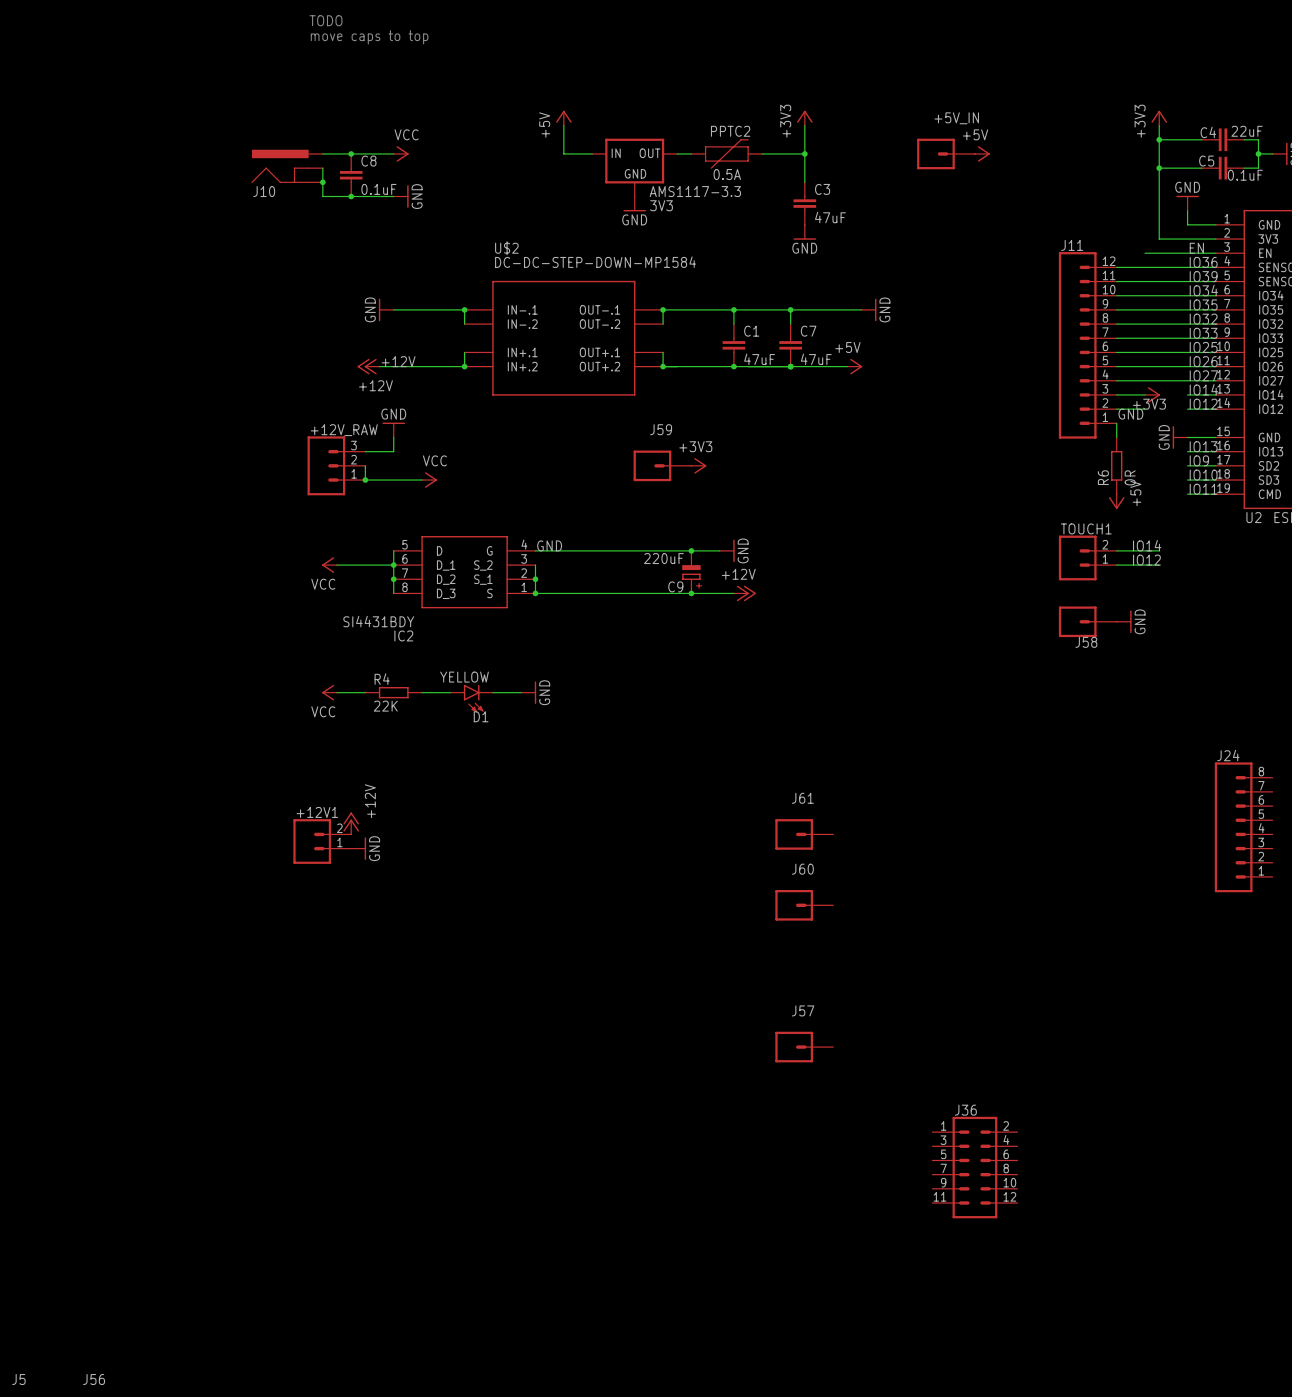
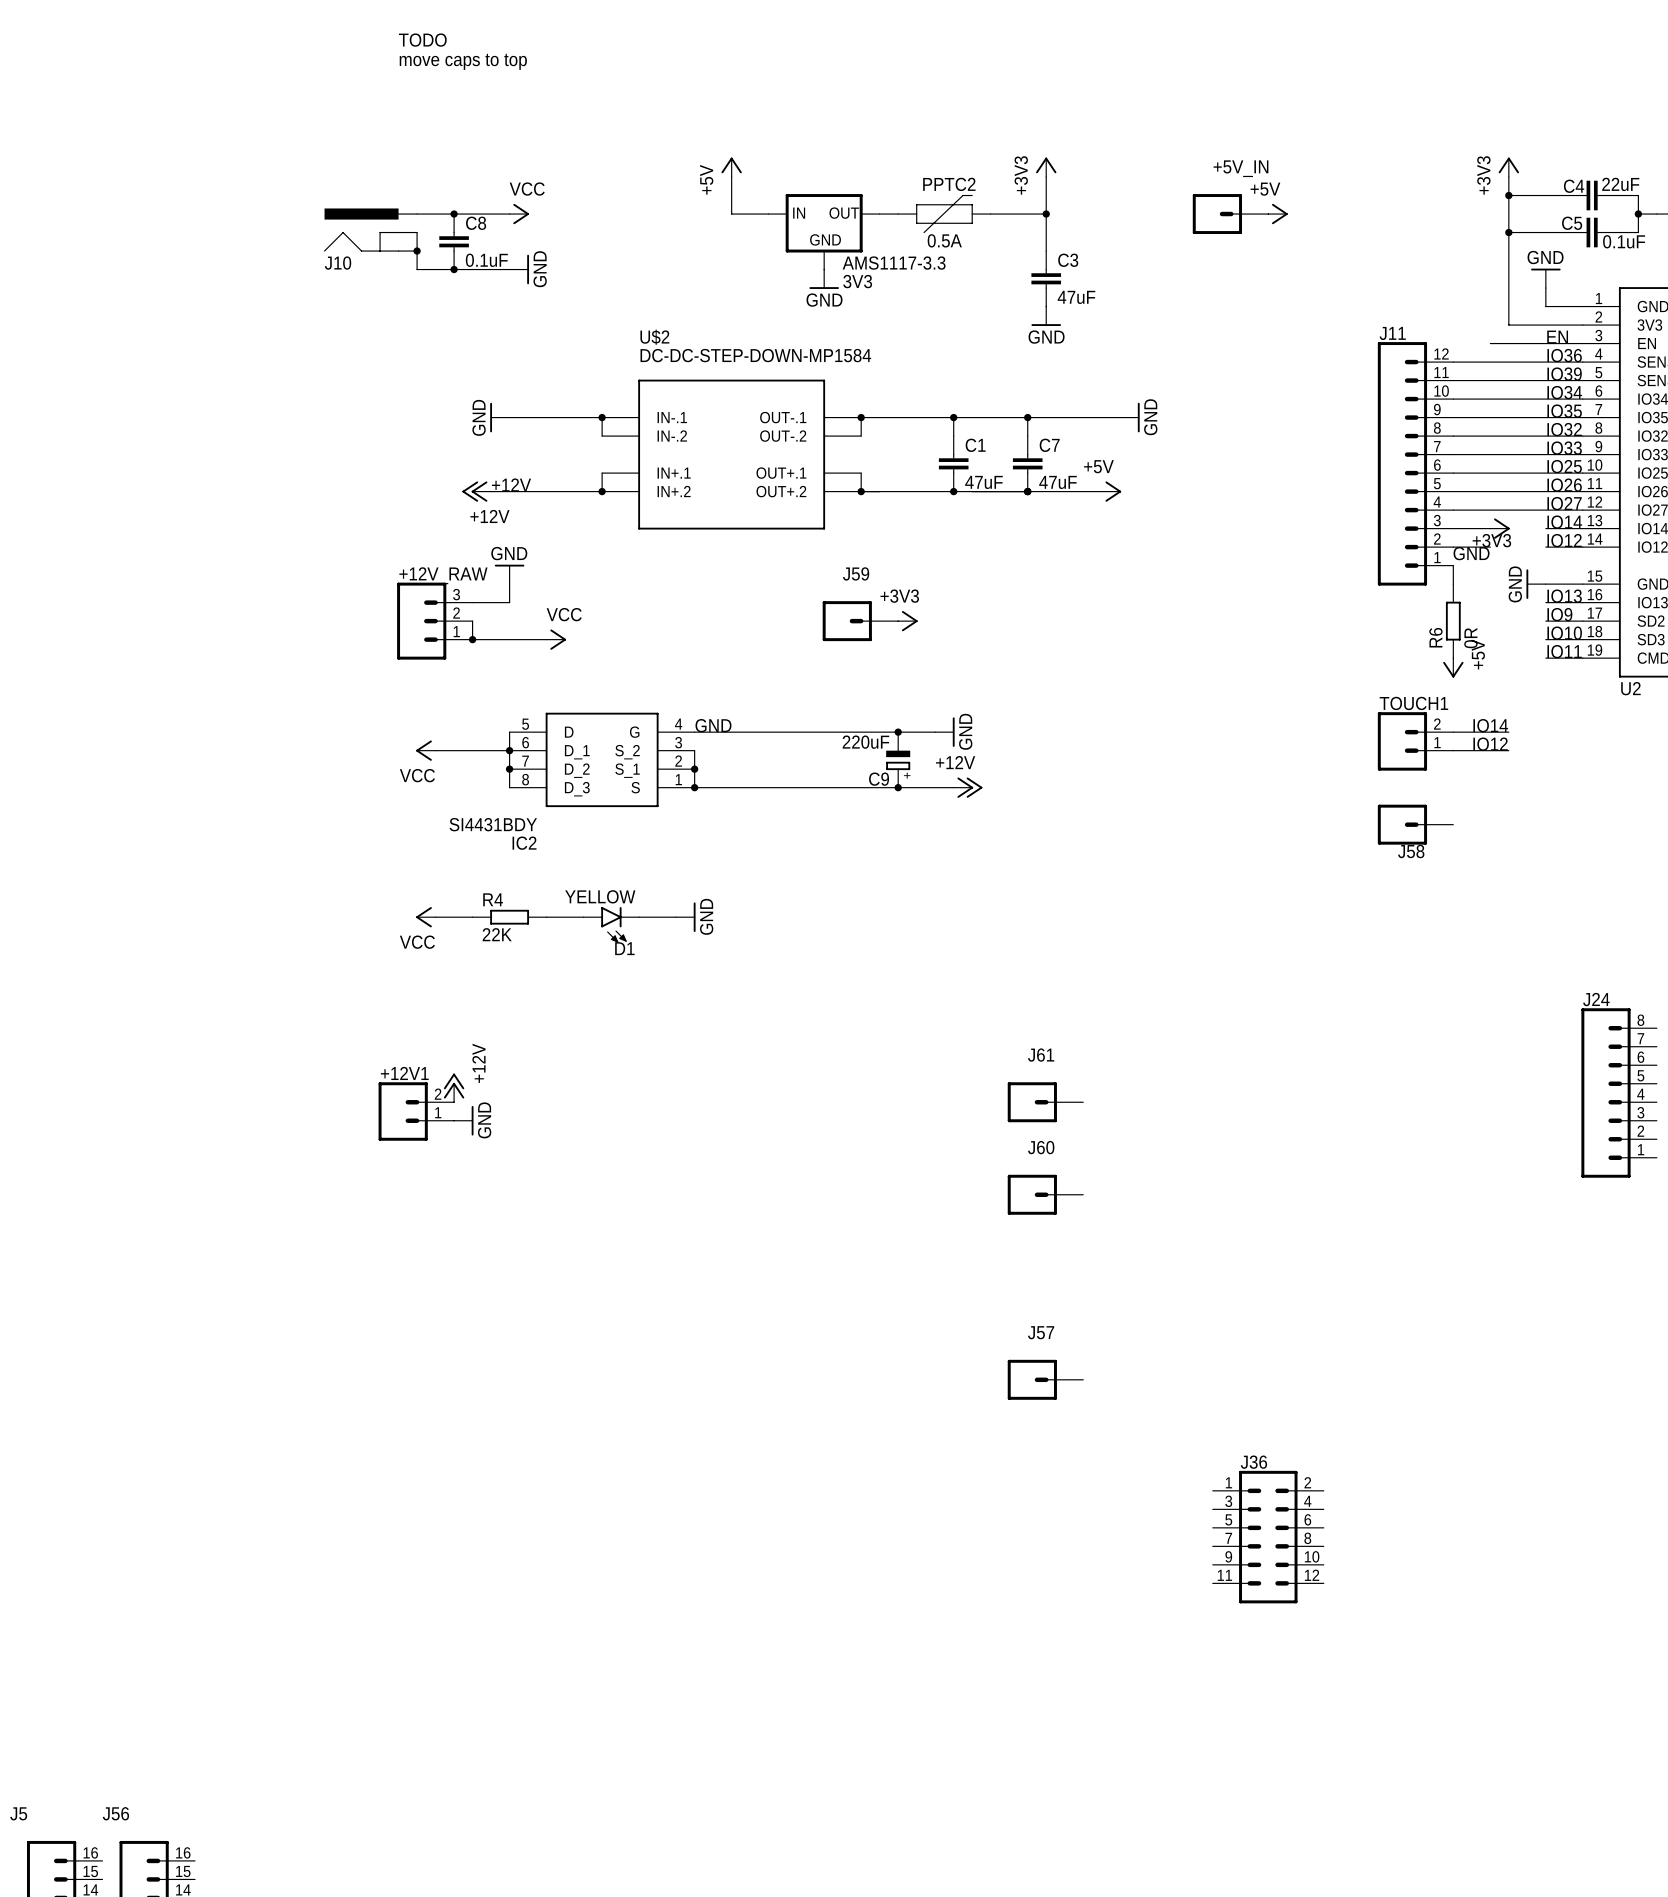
power symbol: GND (1124, 621) -> none

